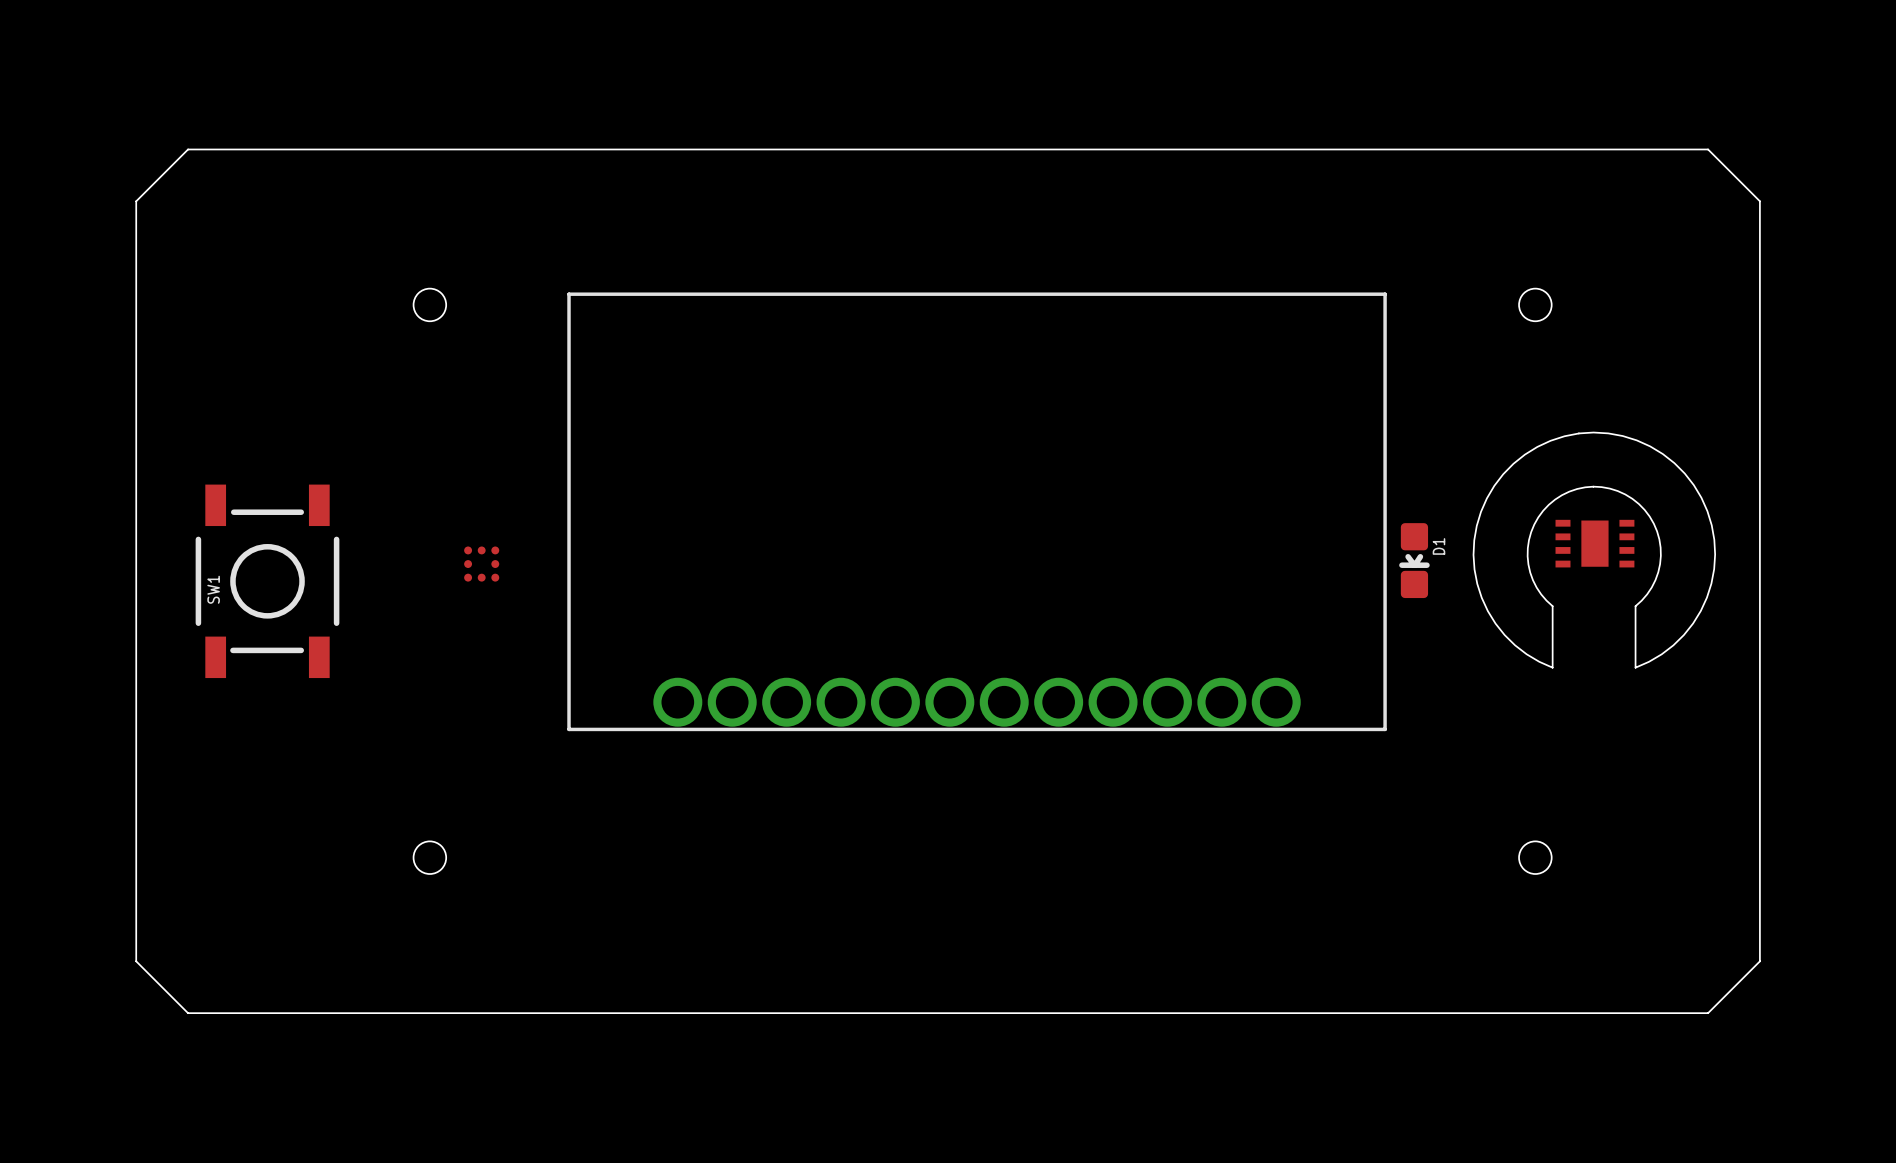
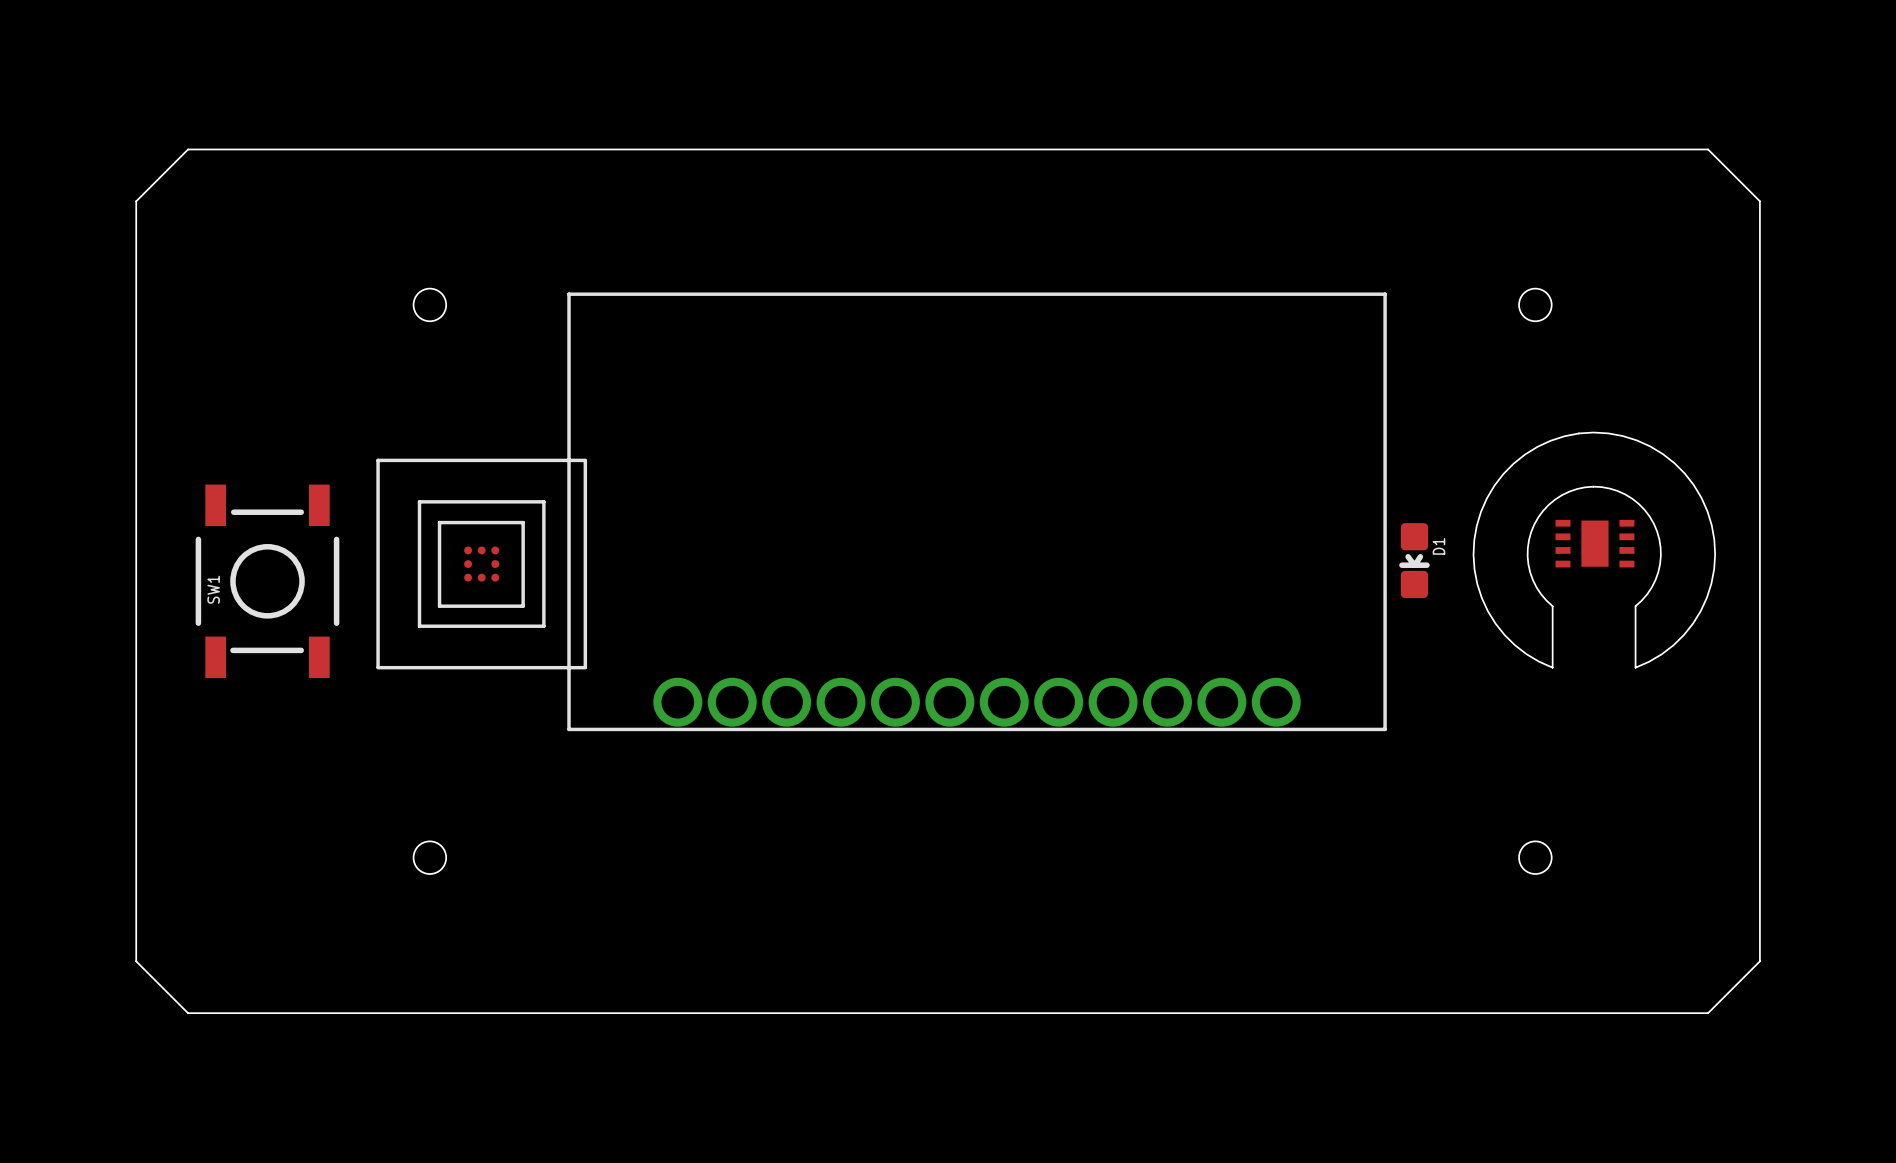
line: none -> (584, 460) (378, 460) (378, 666)
line: none -> (585, 460) (585, 666)
line: none -> (419, 501) (543, 501) (543, 626) (419, 626) (419, 501)
line: none -> (439, 522) (523, 522) (523, 606) (439, 606) (439, 522)
line: none -> (378, 667) (585, 667)

